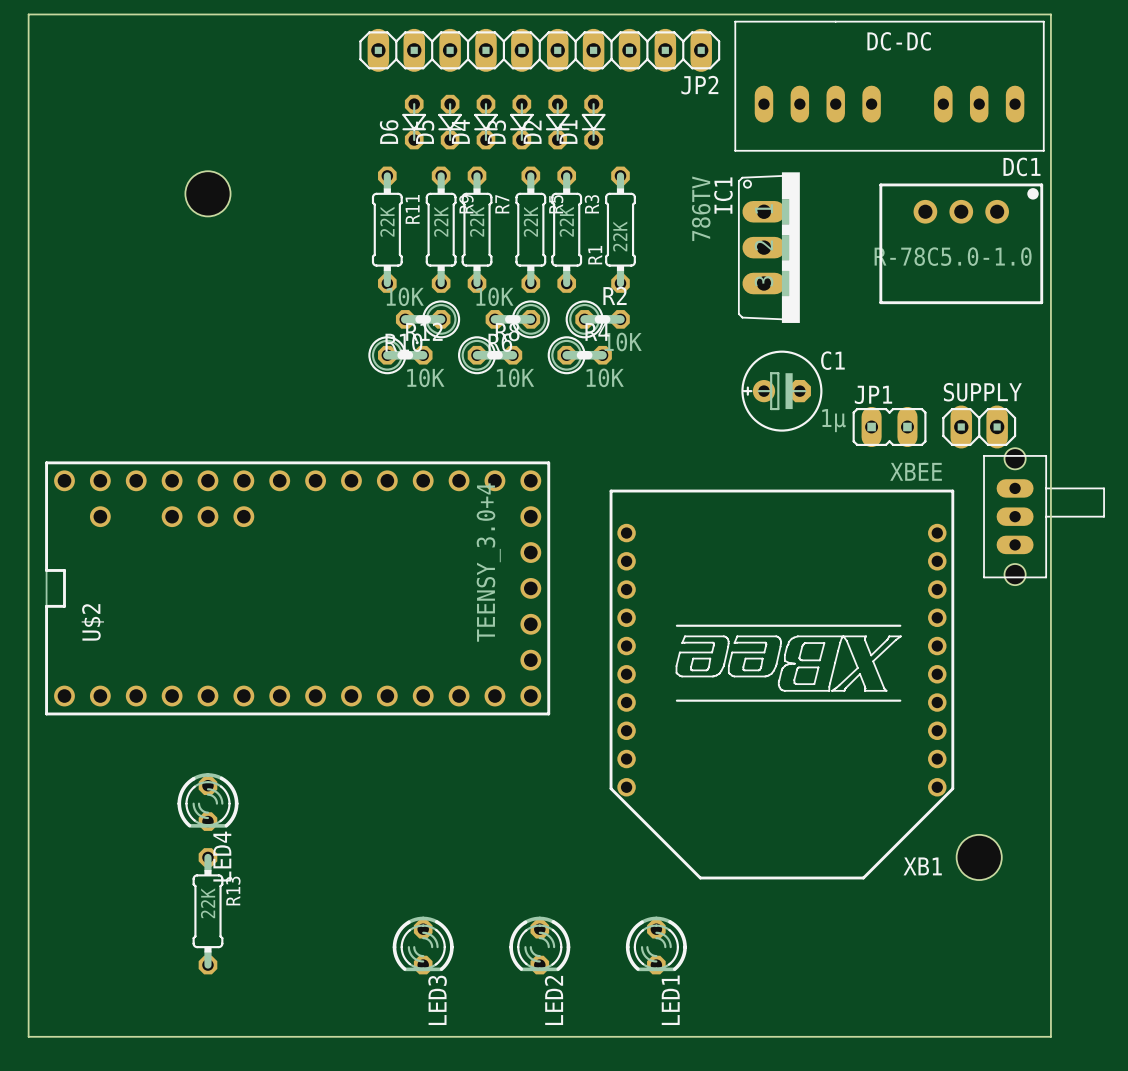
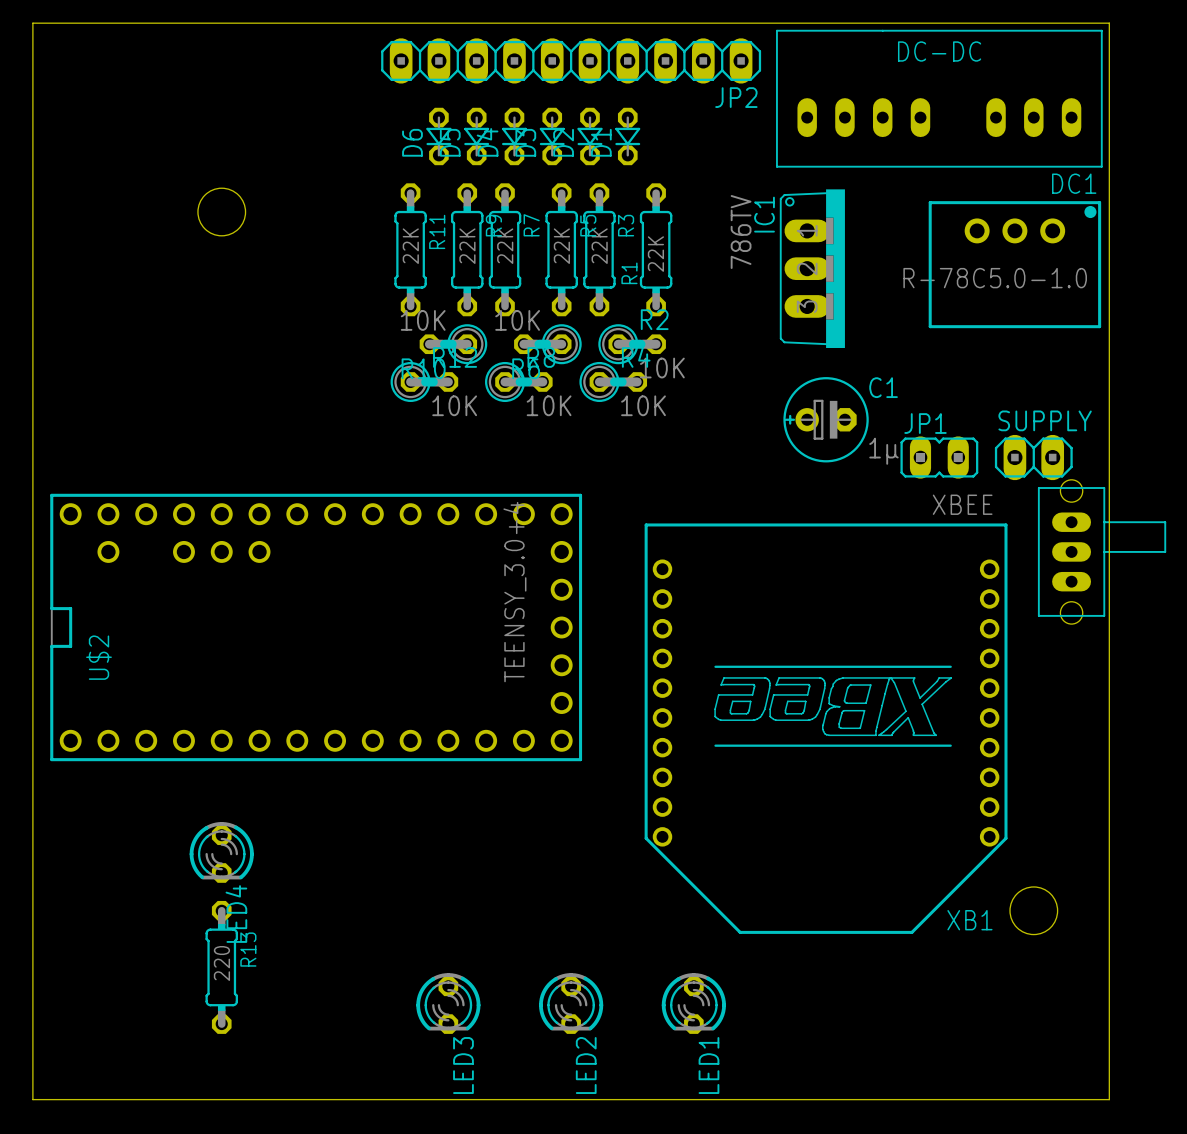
R13 value: 22K (208, 903) -> 220 (221, 963)

